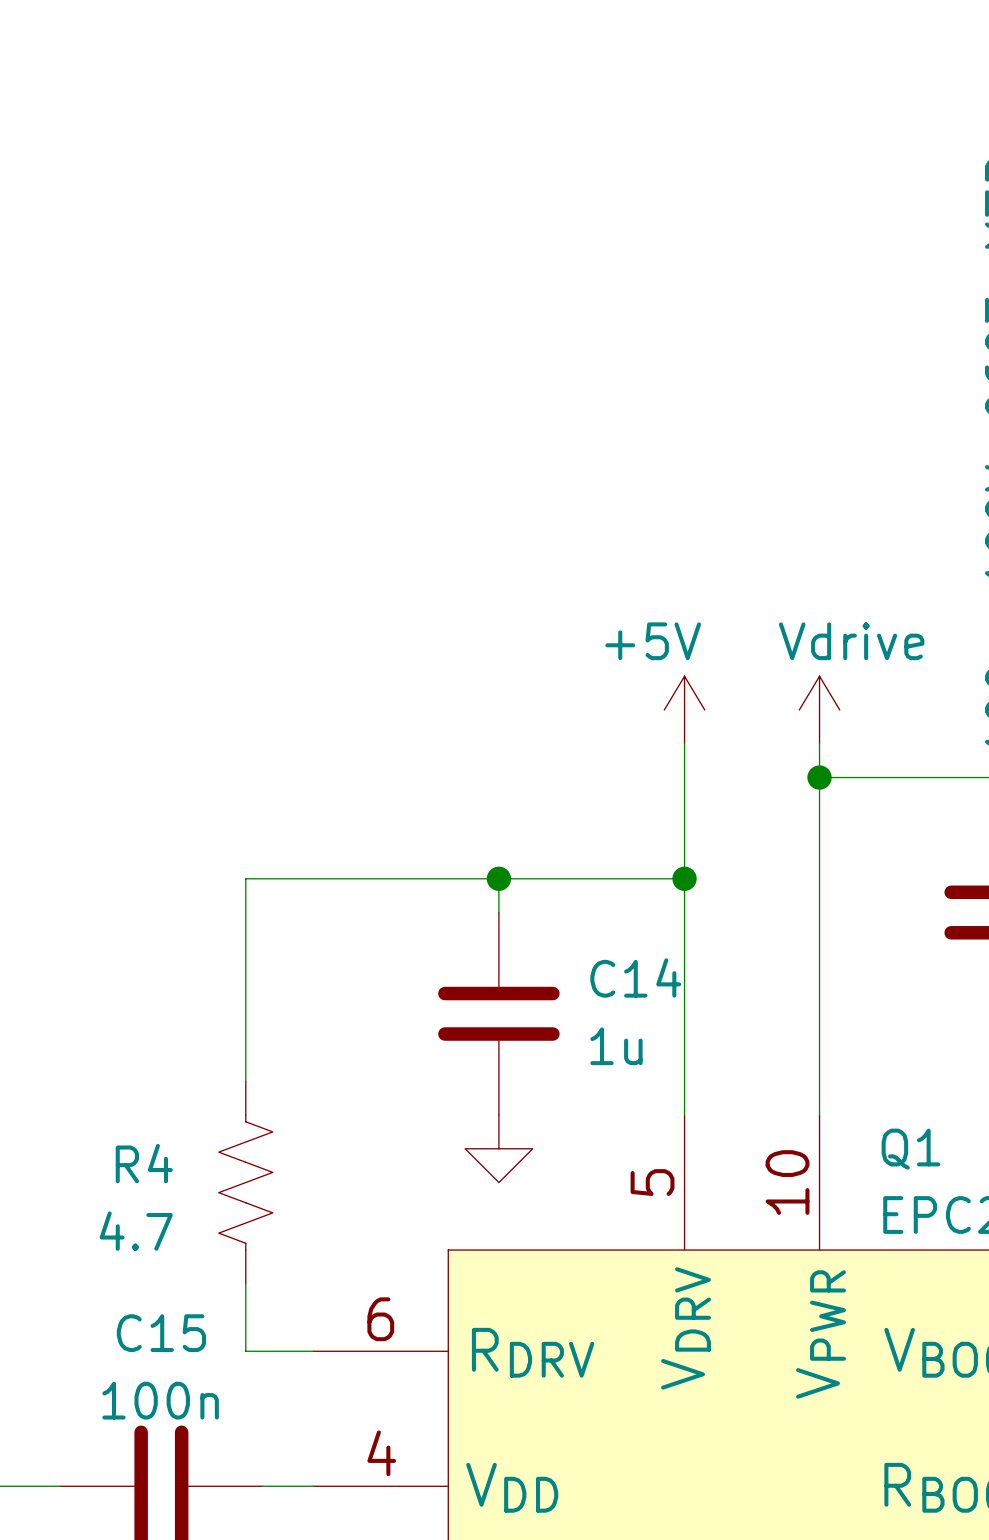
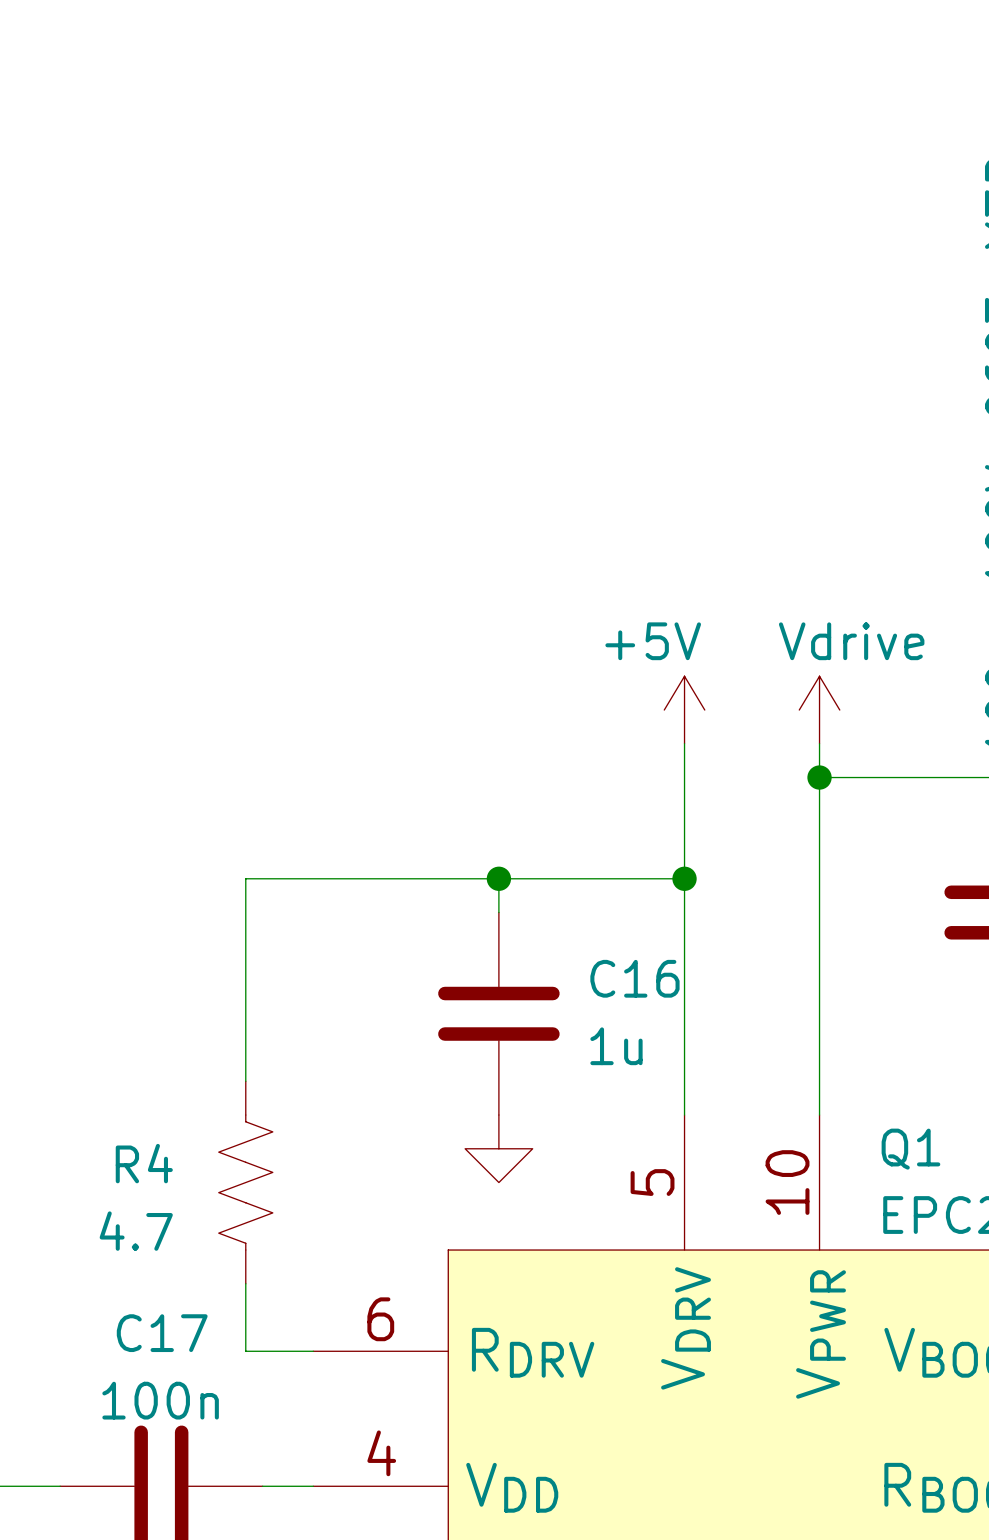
C14 name: C14 (635, 977) -> C16 (634, 978)
C15 name: C15 (161, 1333) -> C17 (162, 1333)

